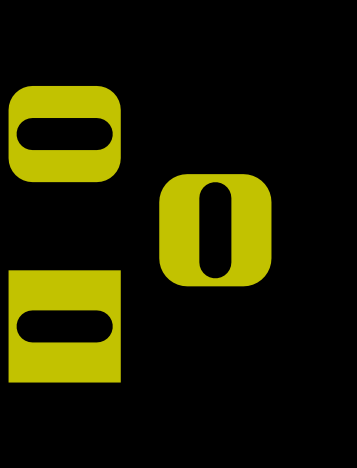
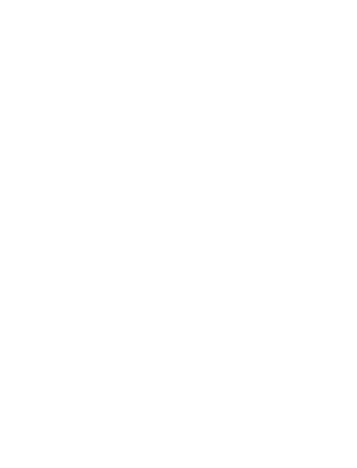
part: (140, 234) -> none

